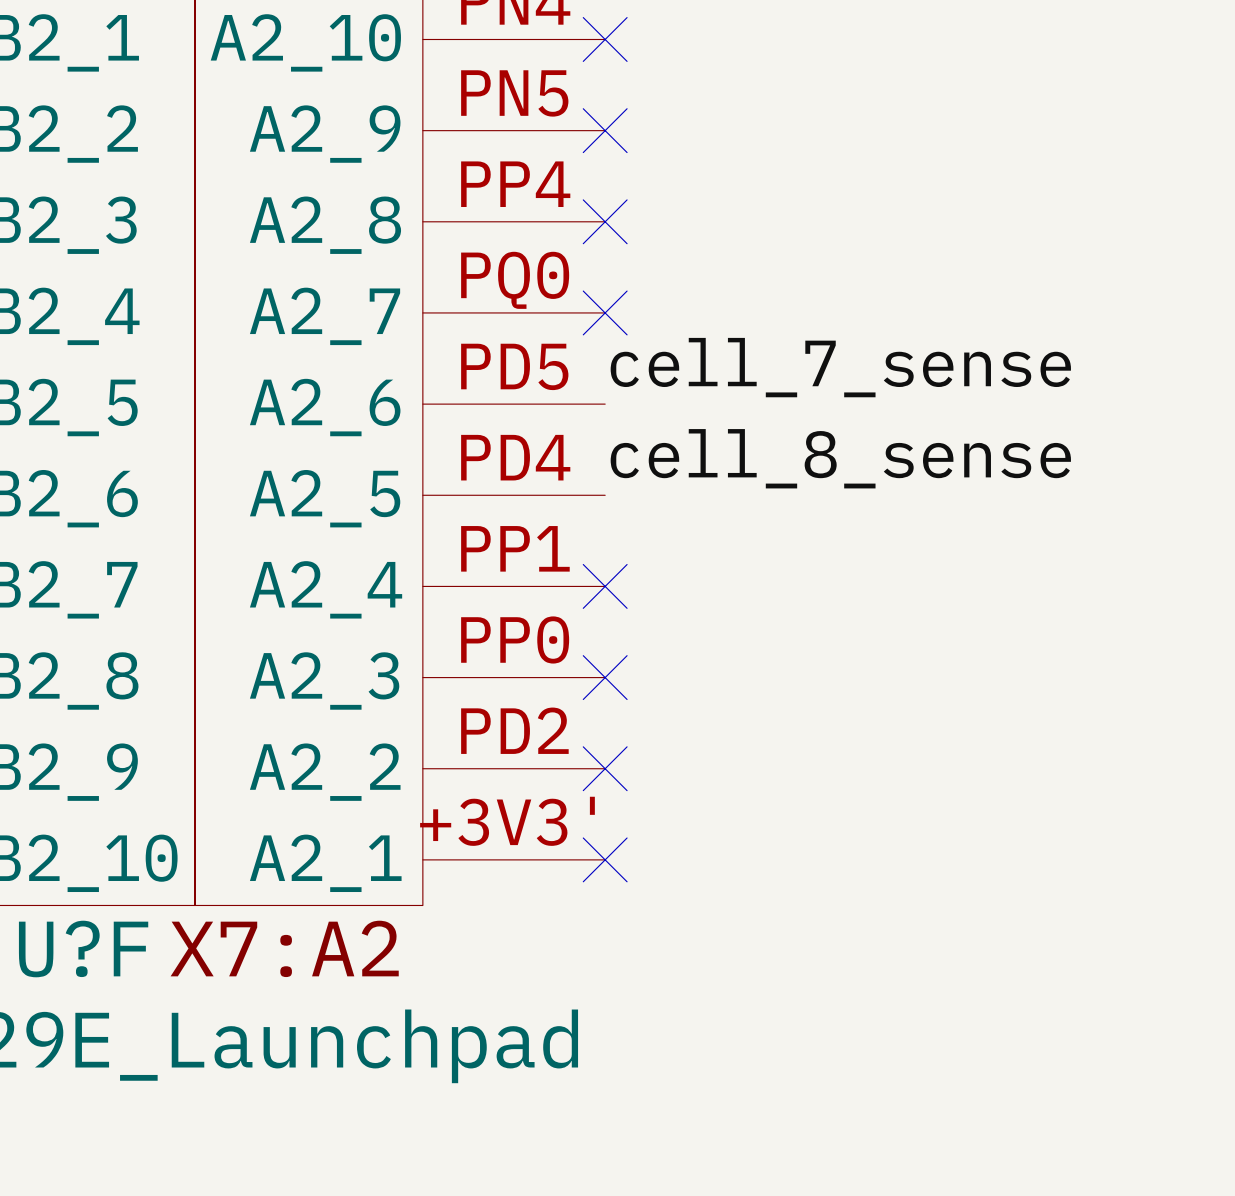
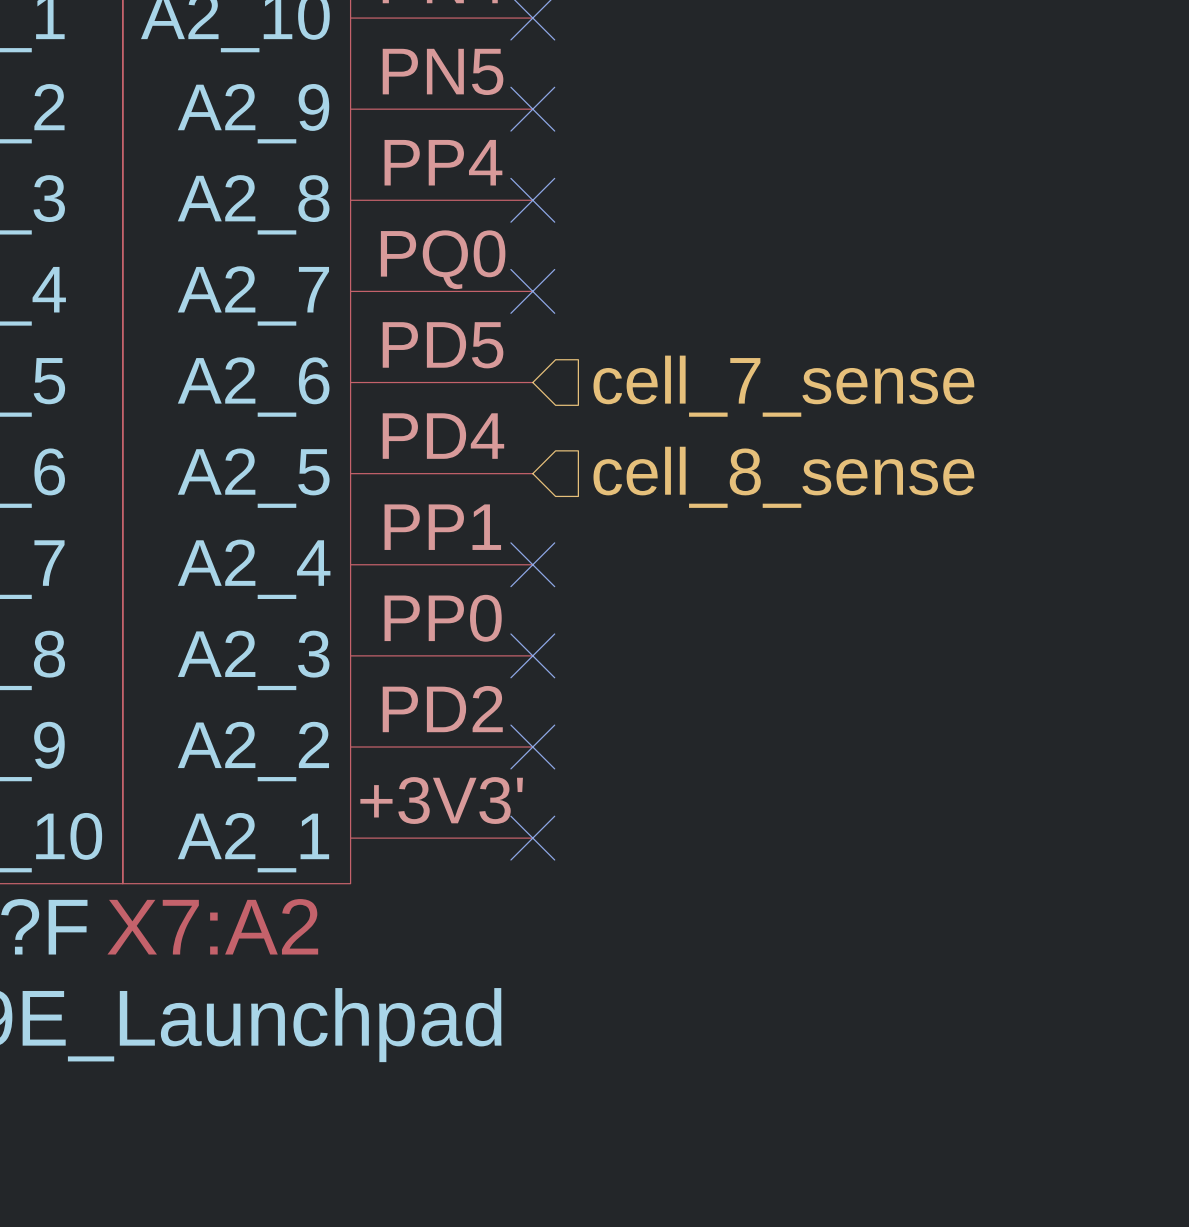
label: cell_7_sense (840, 367) -> none
hierarchical label: none -> cell_7_sense (783, 386)
label: cell_8_sense (840, 458) -> none
hierarchical label: none -> cell_8_sense (783, 477)

